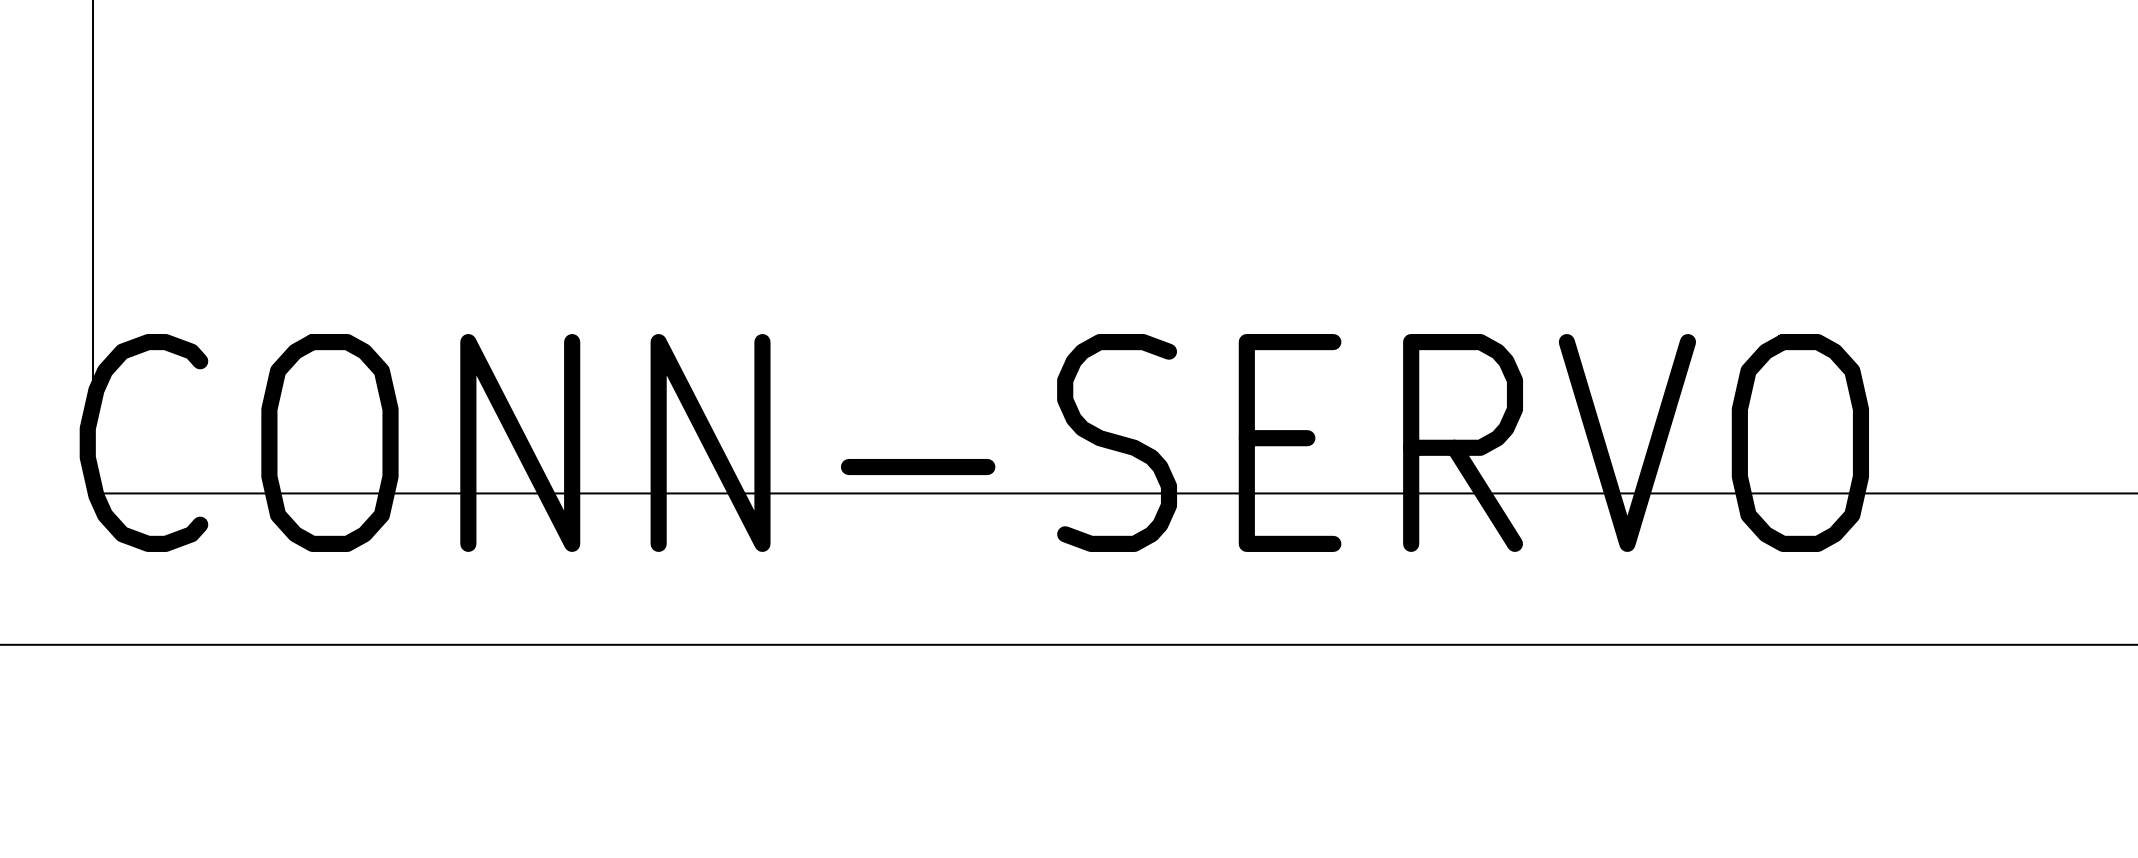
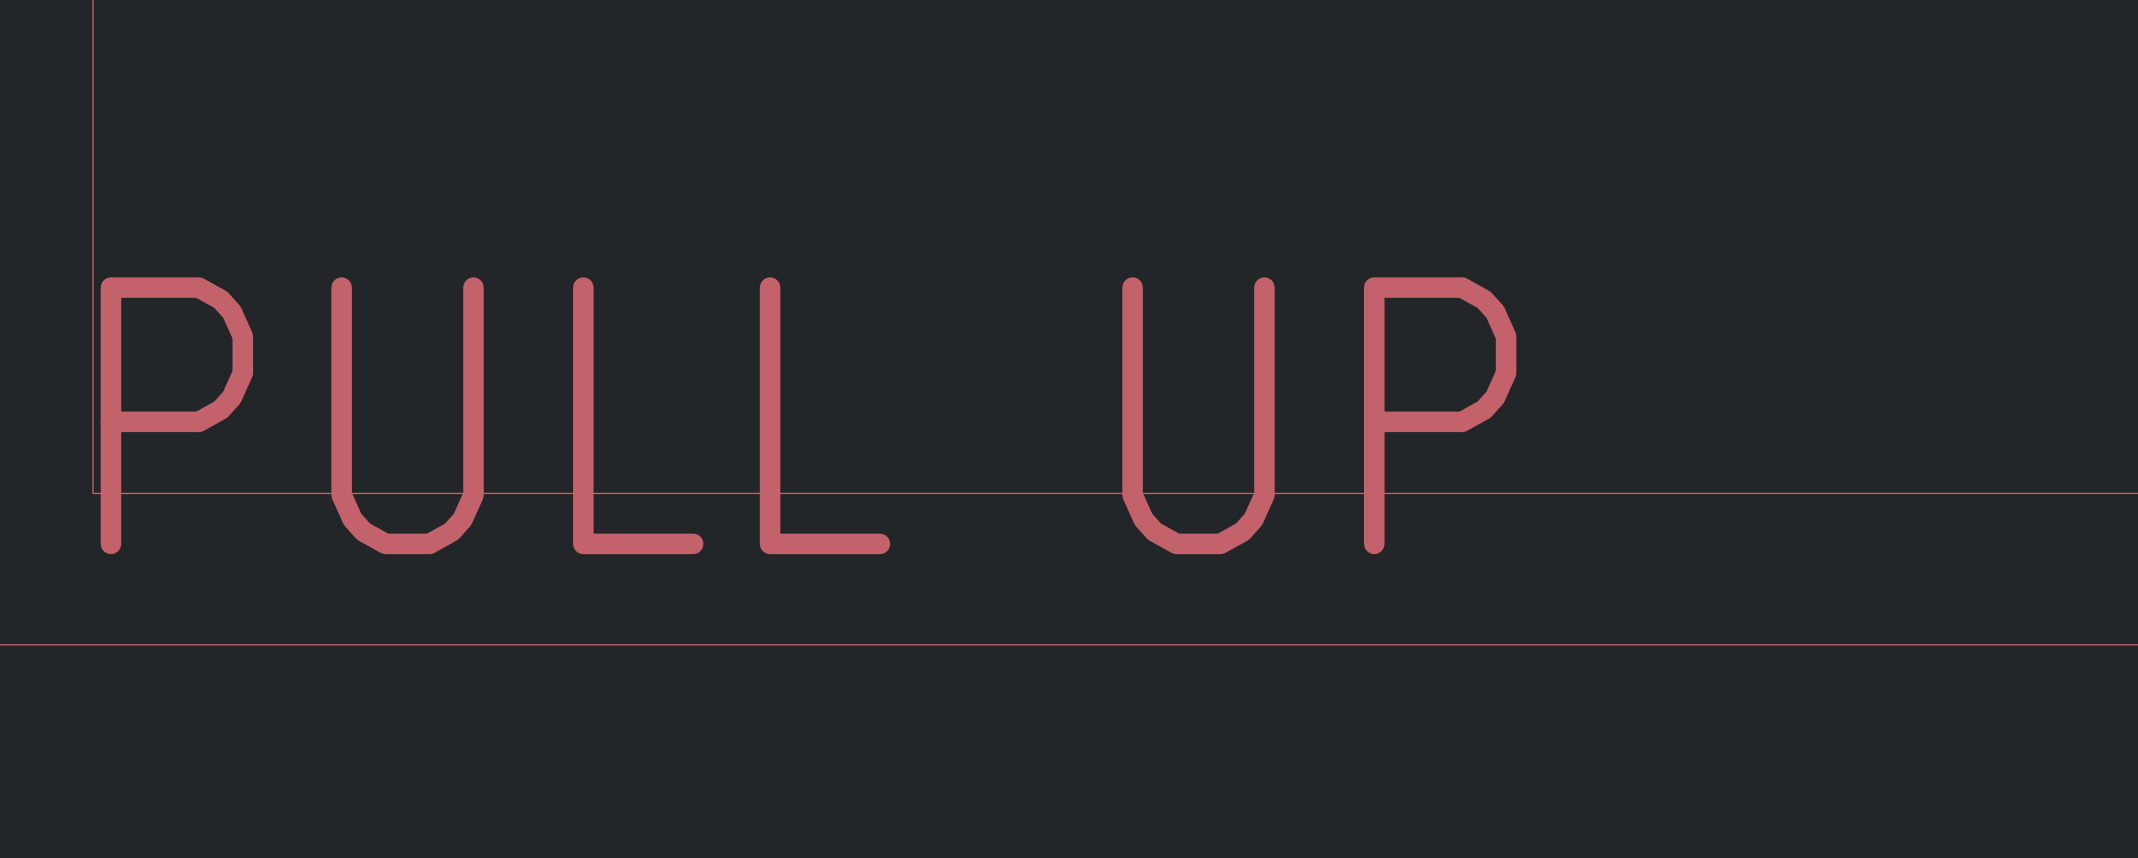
text: CONN-SERVO (974, 442) -> PULL UP (808, 415)

